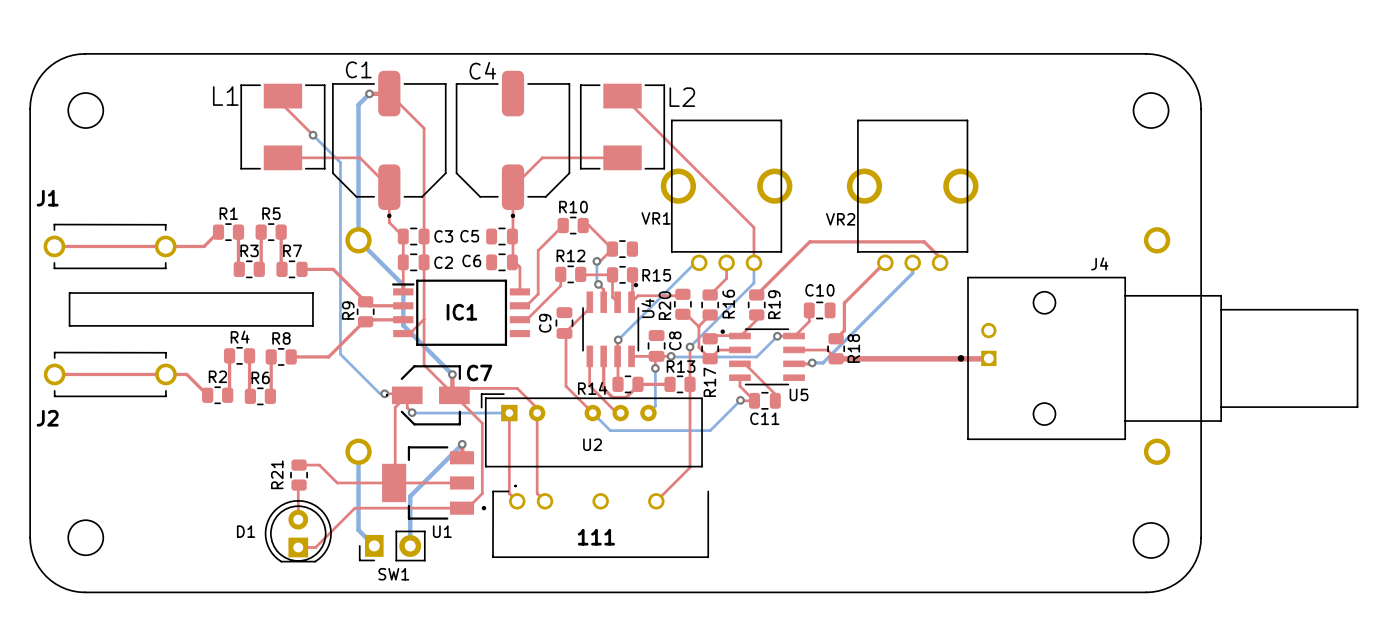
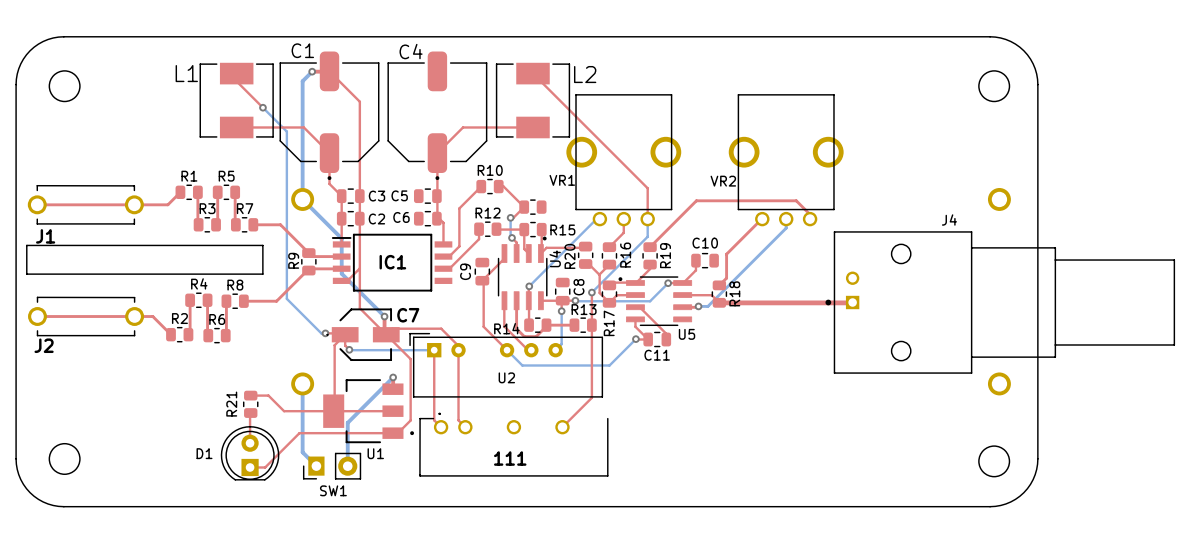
J1 name position: J1 (47, 198) -> J1 (45, 236)
board edge: (69, 293) (69, 325) -> (50, 245) (26, 245) (26, 274) (50, 274)
J2 name position: J2 (47, 418) -> J2 (44, 345)

